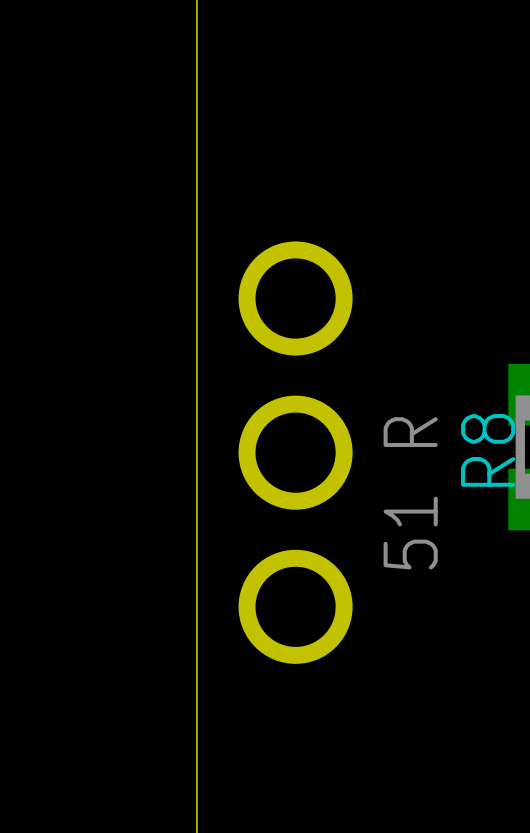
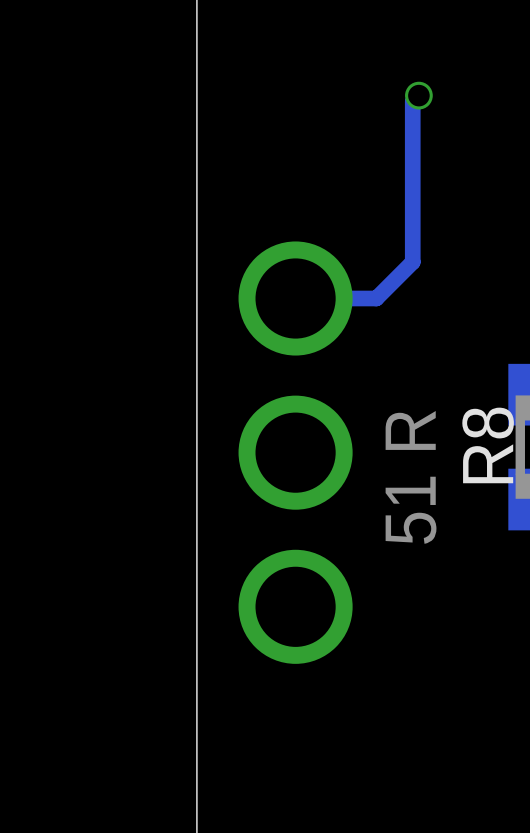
track: none -> (418, 95) (412, 101) (412, 262) (376, 298) (295, 298)
via: none -> (418, 95)

